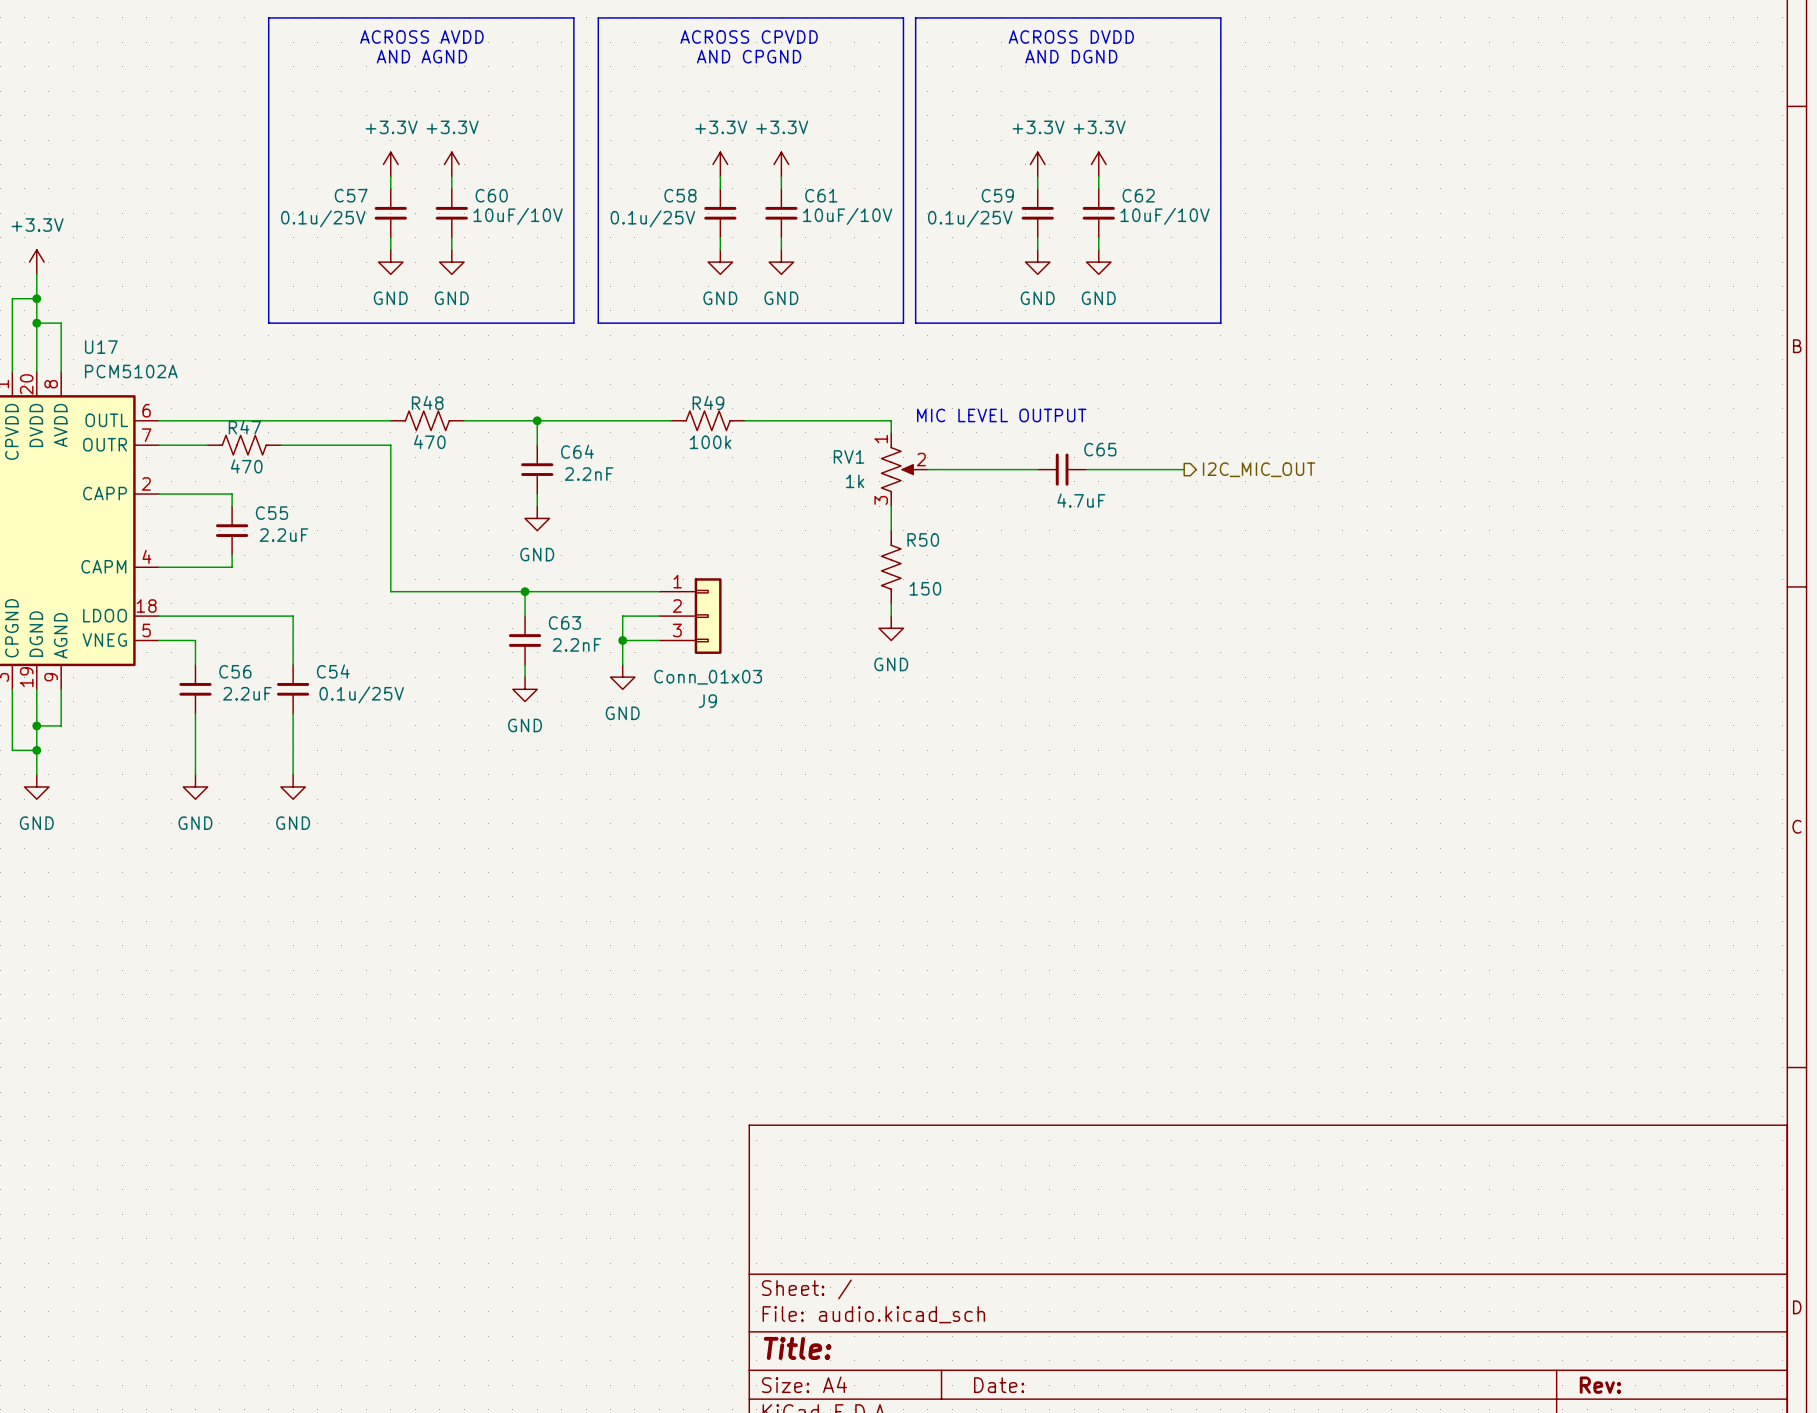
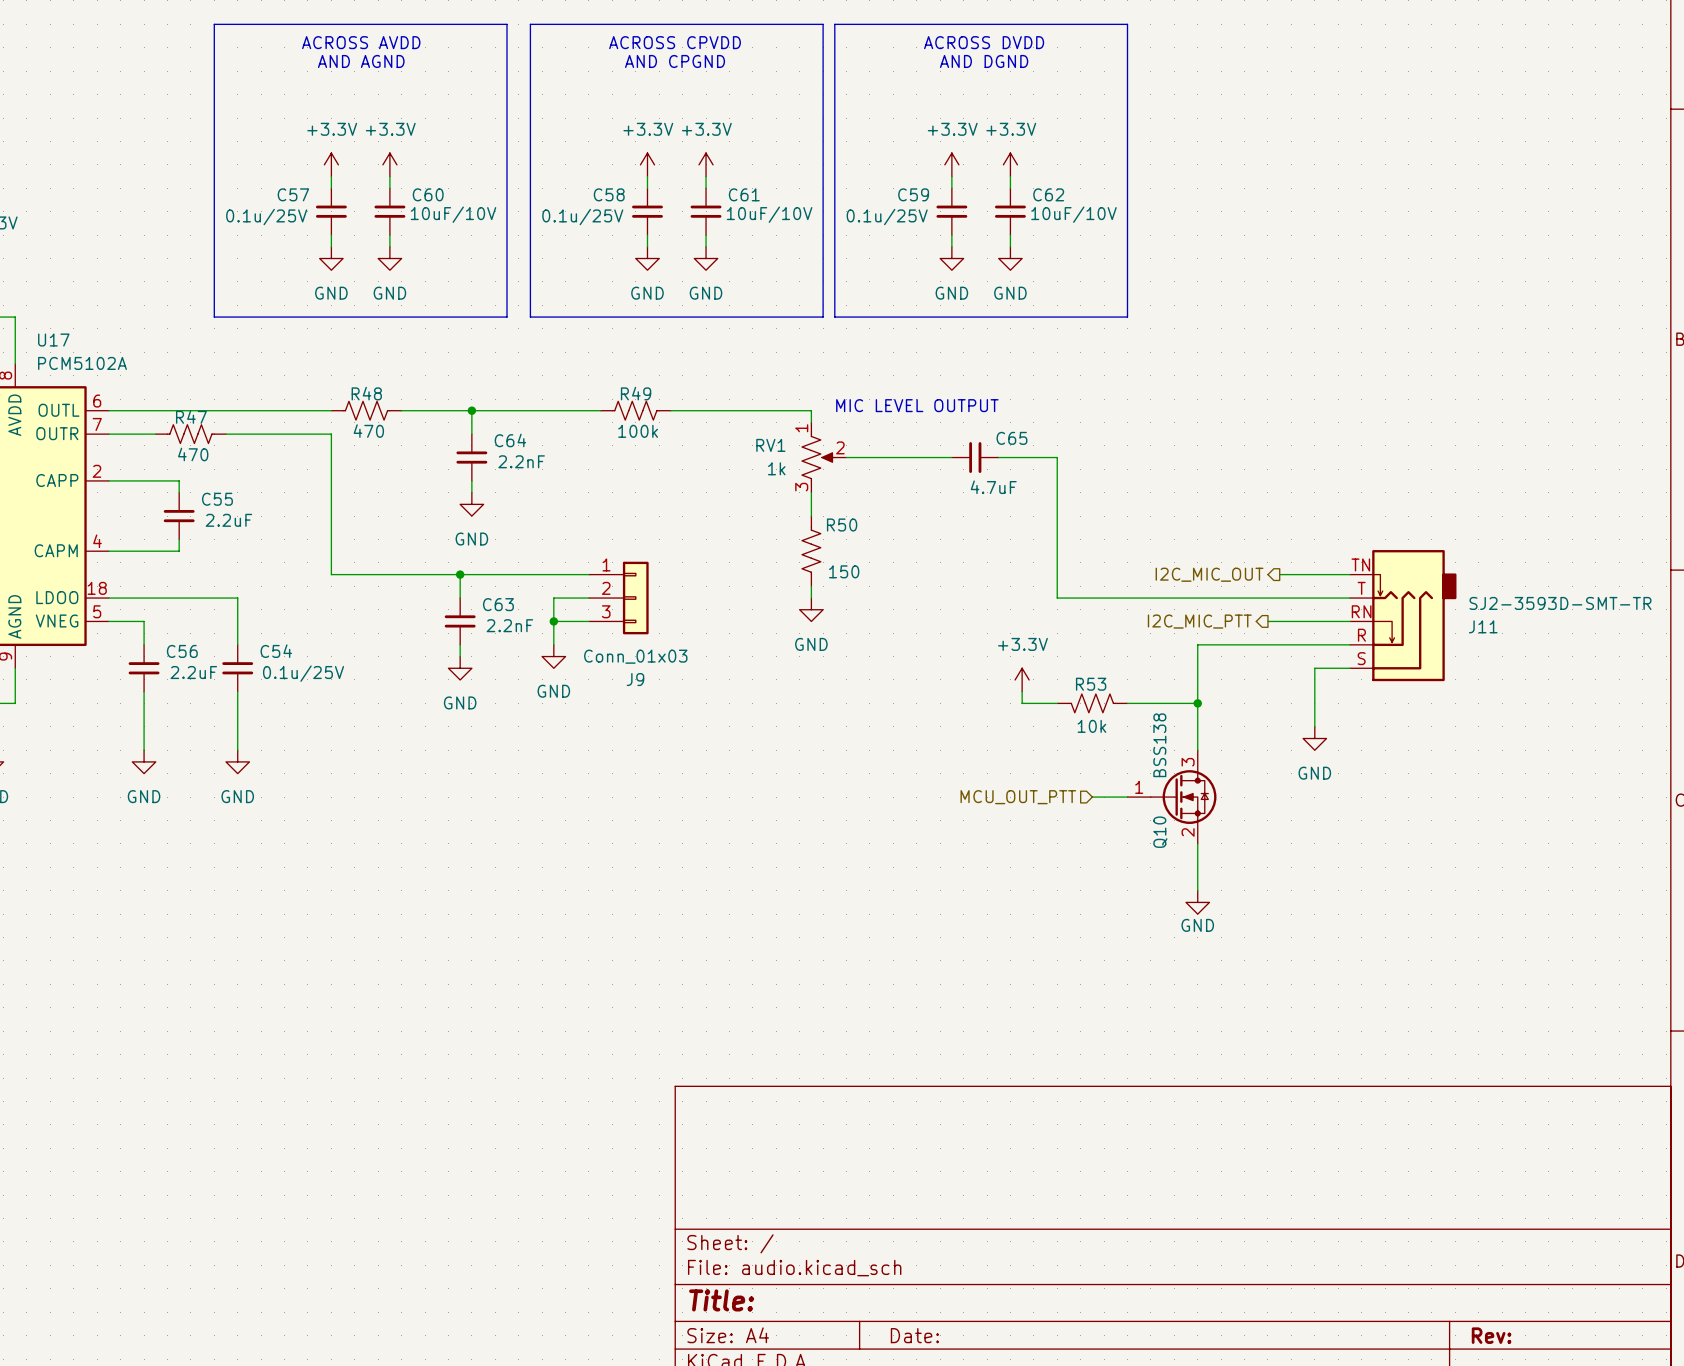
wire: (1147, 469) (1184, 469) -> (1057, 457) (1057, 598) (1349, 598)
hierarchical label rotation: 0° (1259, 469) -> 180° (1209, 574)
wire: none -> (1279, 574) (1349, 574)
J11: none -> SJ2-3593D-SMT-TR (1403, 615)
hierarchical label: none -> I2C_MIC_PTT (1199, 621)
wire: none -> (1267, 621) (1349, 621)
wire: none -> (1349, 644) (1197, 644) (1197, 750)
wire: none -> (1349, 668) (1314, 668) (1314, 726)
power symbol: none -> +3.3V (1022, 679)
wire: none -> (1022, 691) (1022, 703) (1057, 703)
R53: none -> 10k (1092, 703)
wire: none -> (1127, 703) (1197, 703)
junction: none -> (1197, 703)
power symbol: none -> GND (1314, 738)
hierarchical label: none -> MCU_OUT_PTT (1018, 797)
wire: none -> (1092, 797) (1127, 797)
Q10: none -> BSS138 (1171, 797)
wire: none -> (1197, 843) (1197, 890)
power symbol: none -> GND (1197, 902)

